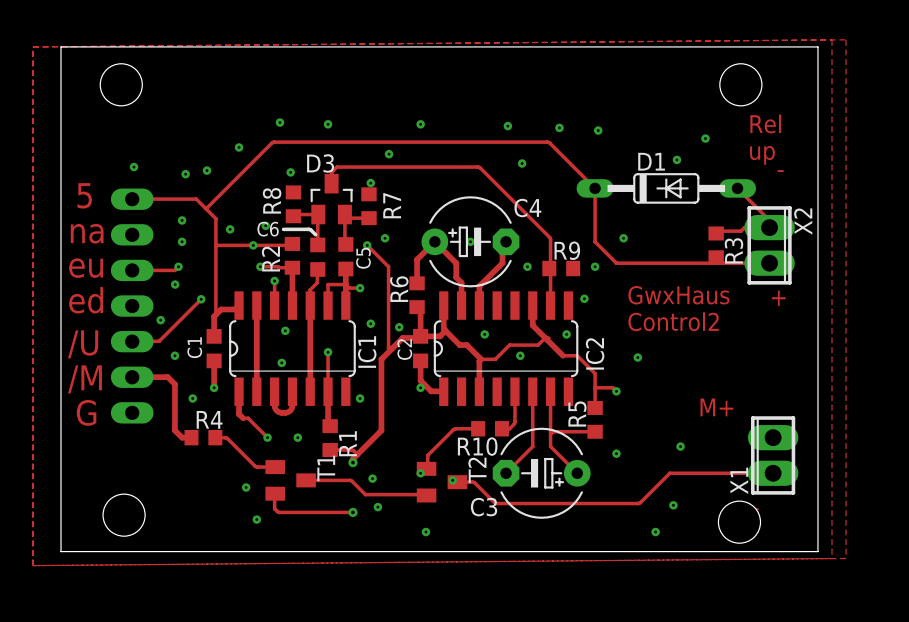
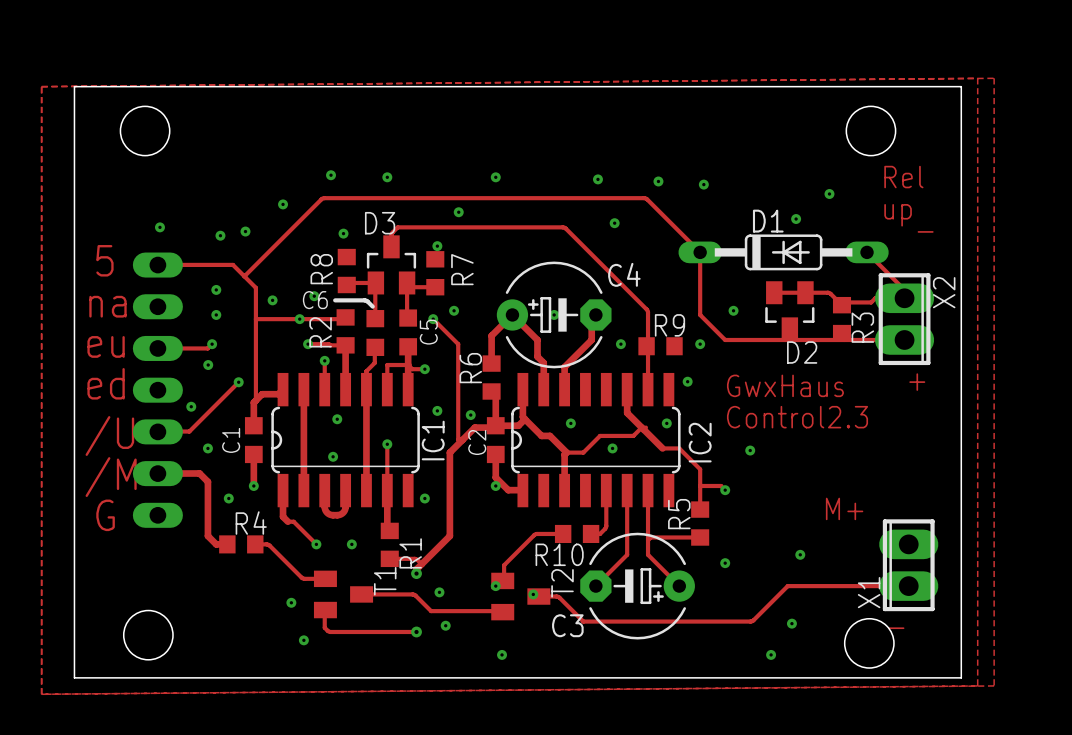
track: none -> (774, 292) (828, 292) (841, 305)
D2: none -> (789, 310)
text position: GwxHaus (678, 295) -> GwxHaus (785, 385)
text: Control2 (673, 321) -> Control2.3 (797, 417)

